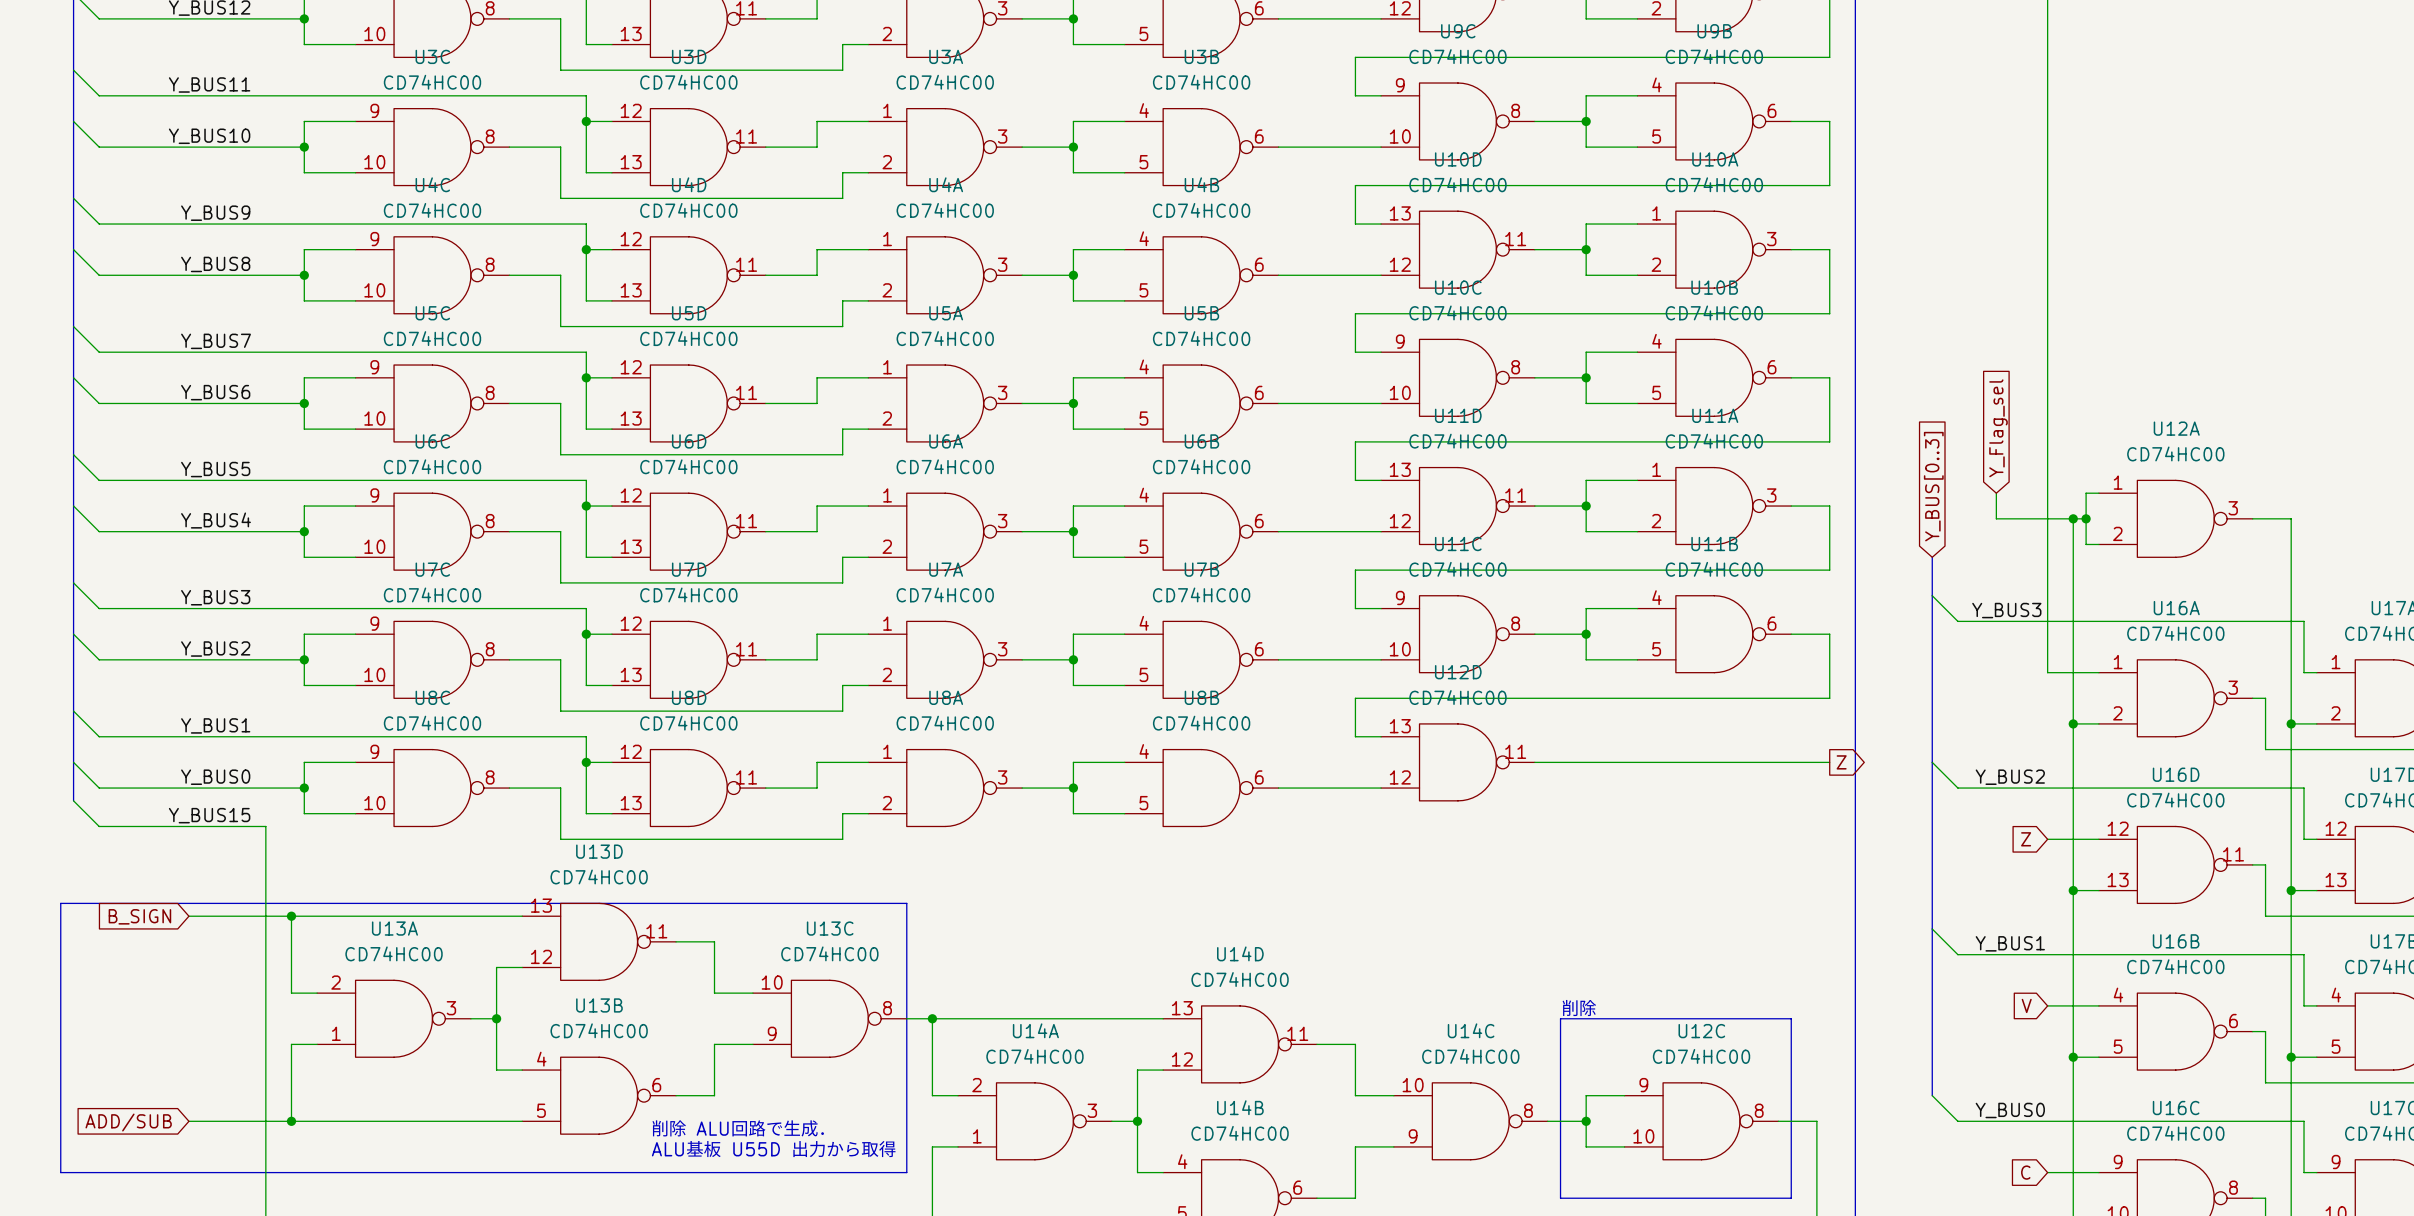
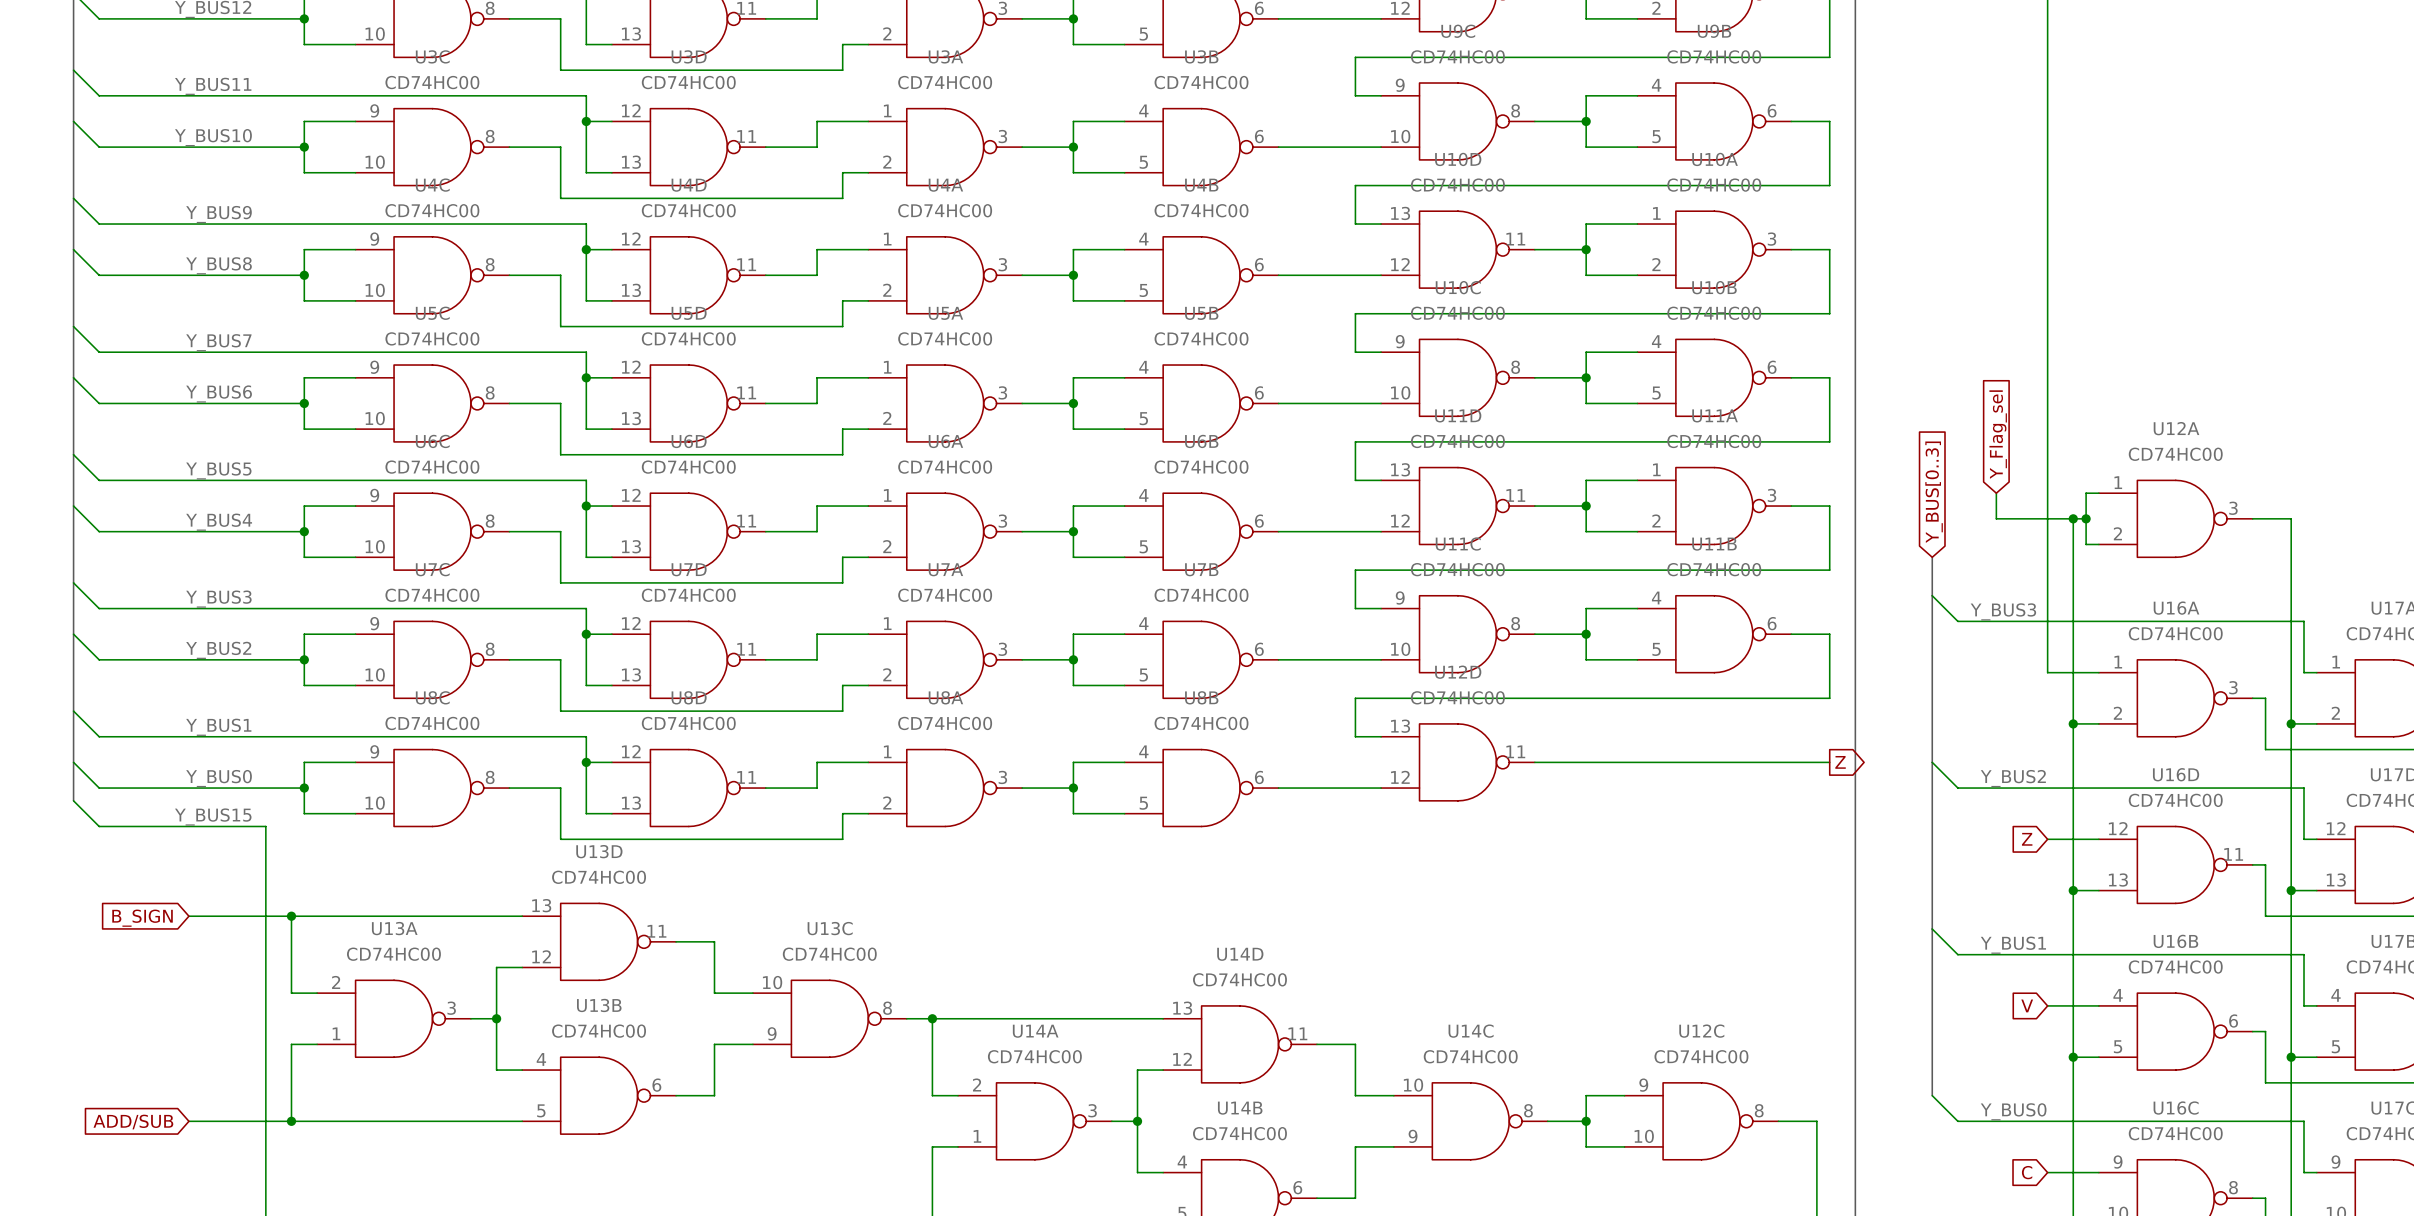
line: (60, 903) (60, 1172) (906, 1172) (906, 903) (60, 903) -> none
text: 削除 (1579, 1008) -> none
line: (1560, 1018) (1791, 1018) (1791, 1198) (1560, 1198) (1560, 1018) -> none
text: 削除 ALU回路で生成． (738, 1128) -> none
text: ALU基板 U55D 出力から取得 (774, 1149) -> none

